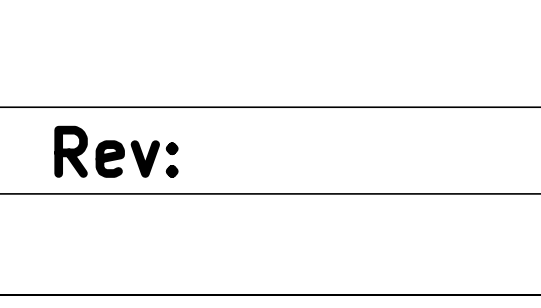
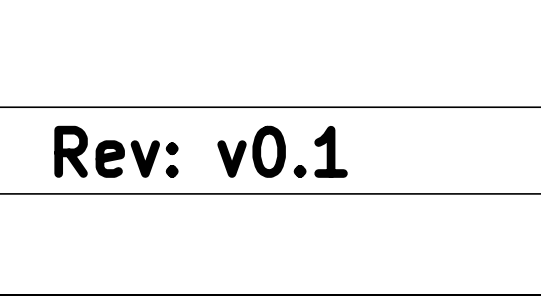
title block: Rev: (116, 151) -> Rev: v0.1 (201, 151)

